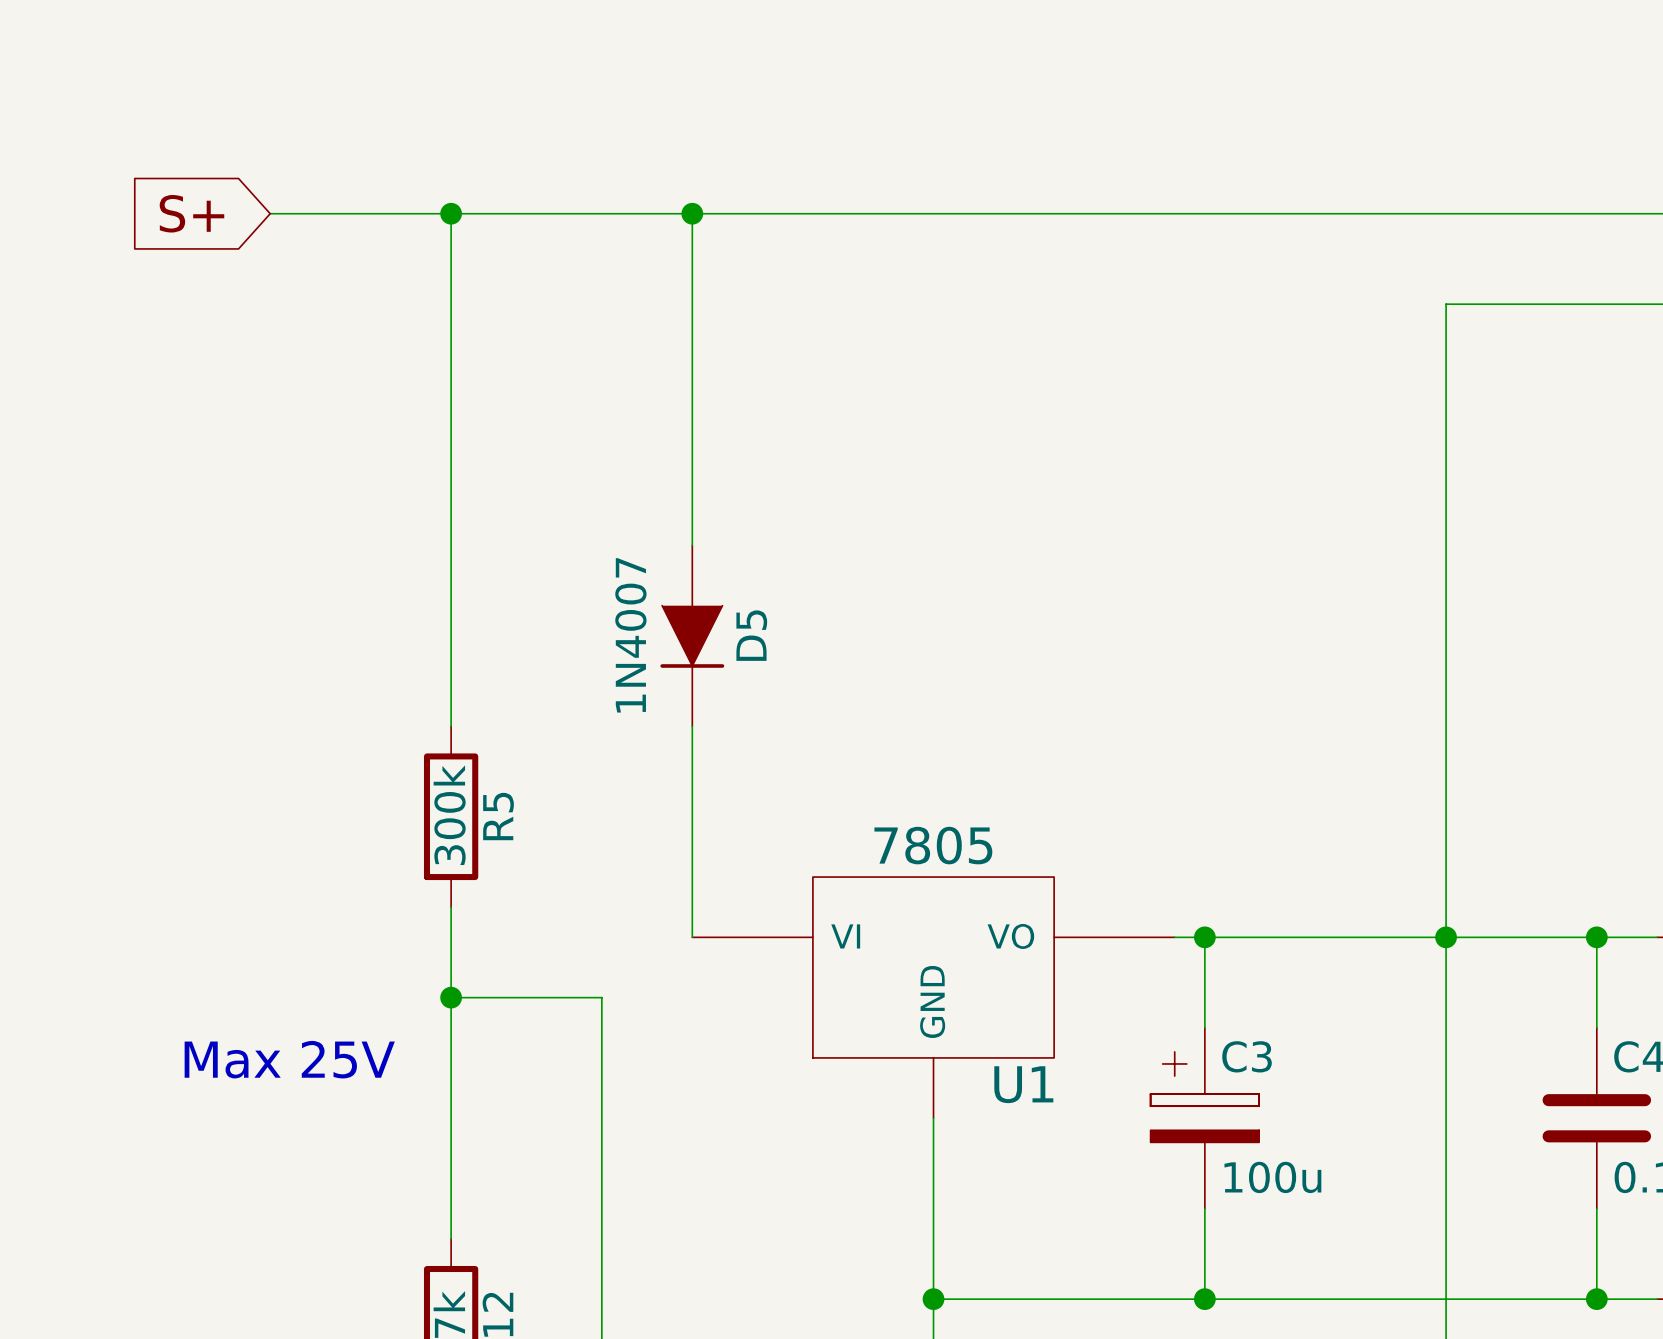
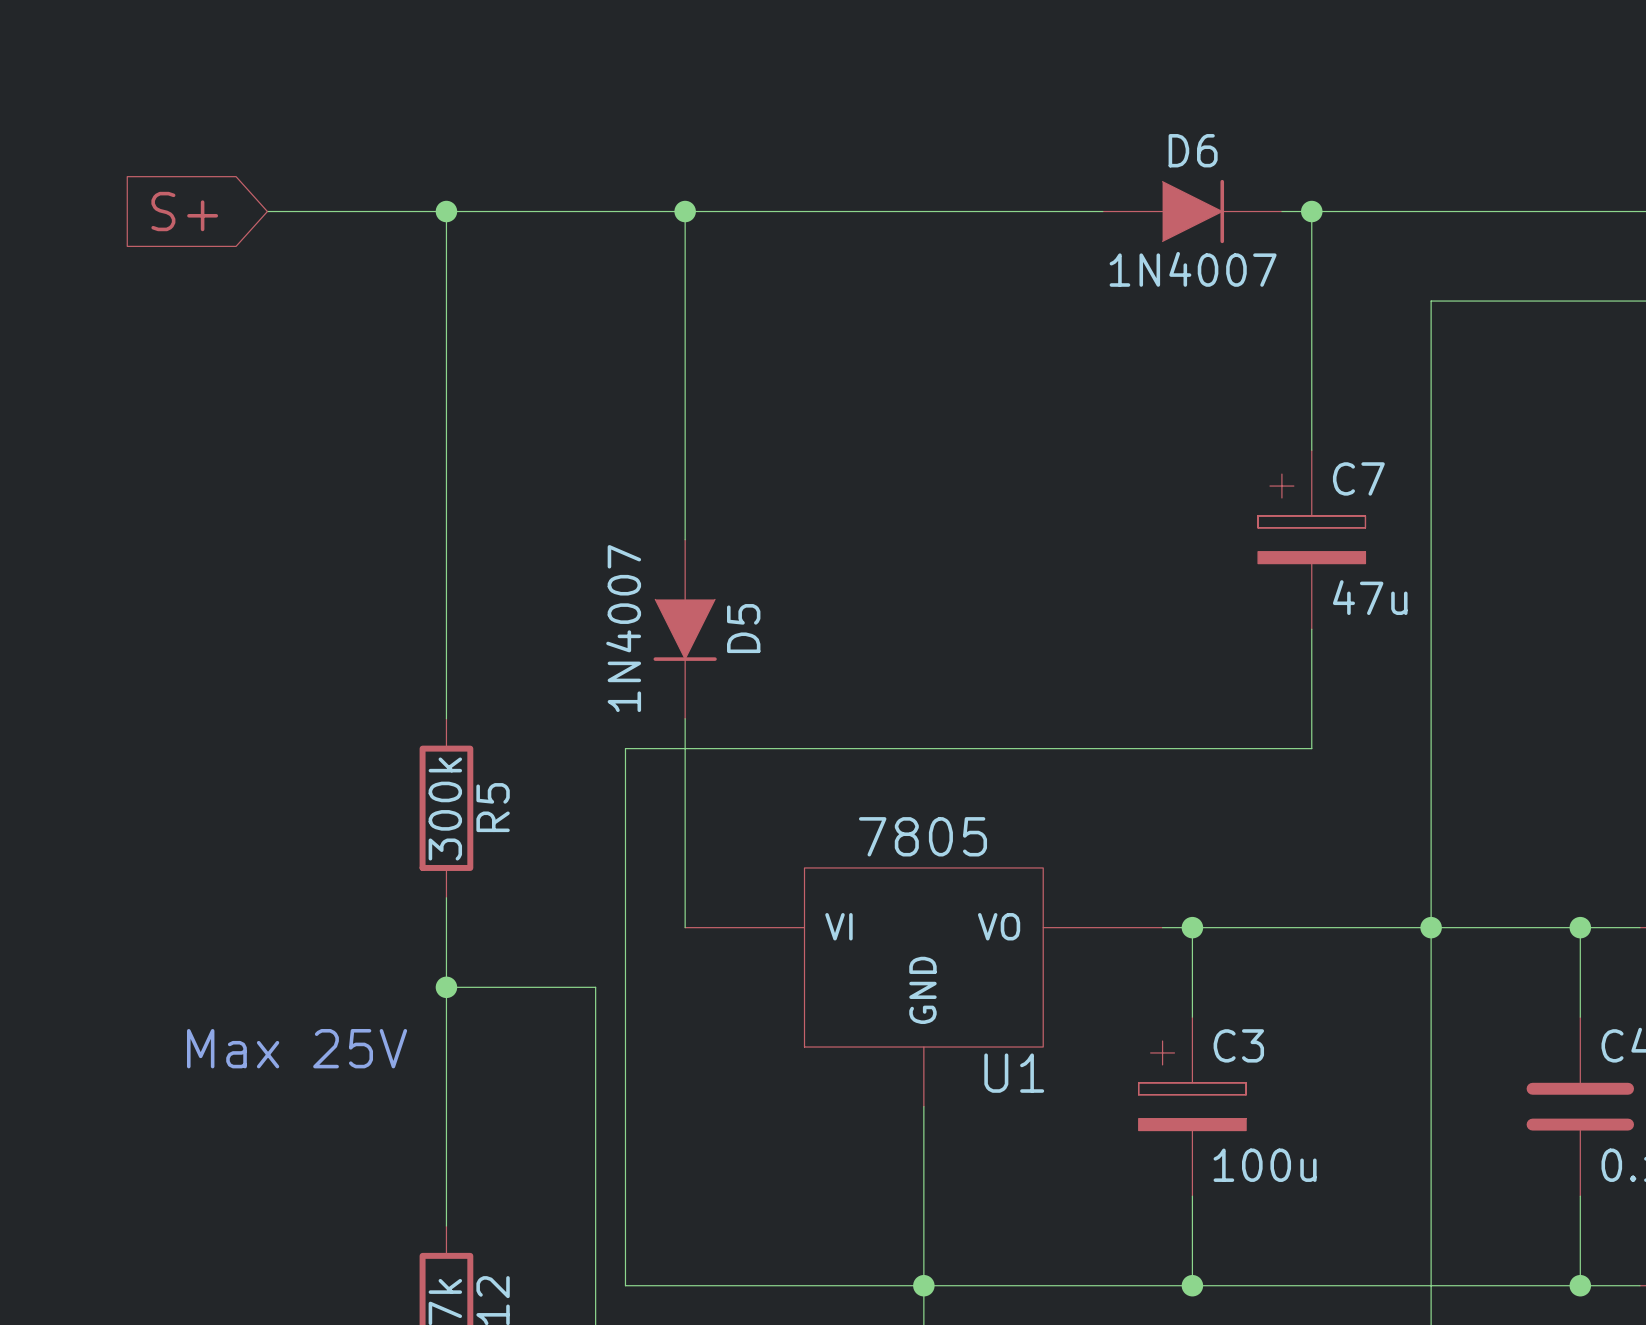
D6: none -> 1N4007 (1192, 211)
wire: none -> (1311, 211) (1311, 450)
junction: none -> (1311, 211)
C7: none -> 47u (1311, 539)
wire: none -> (1311, 629) (1311, 748) (625, 748) (625, 1285) (923, 1285)

